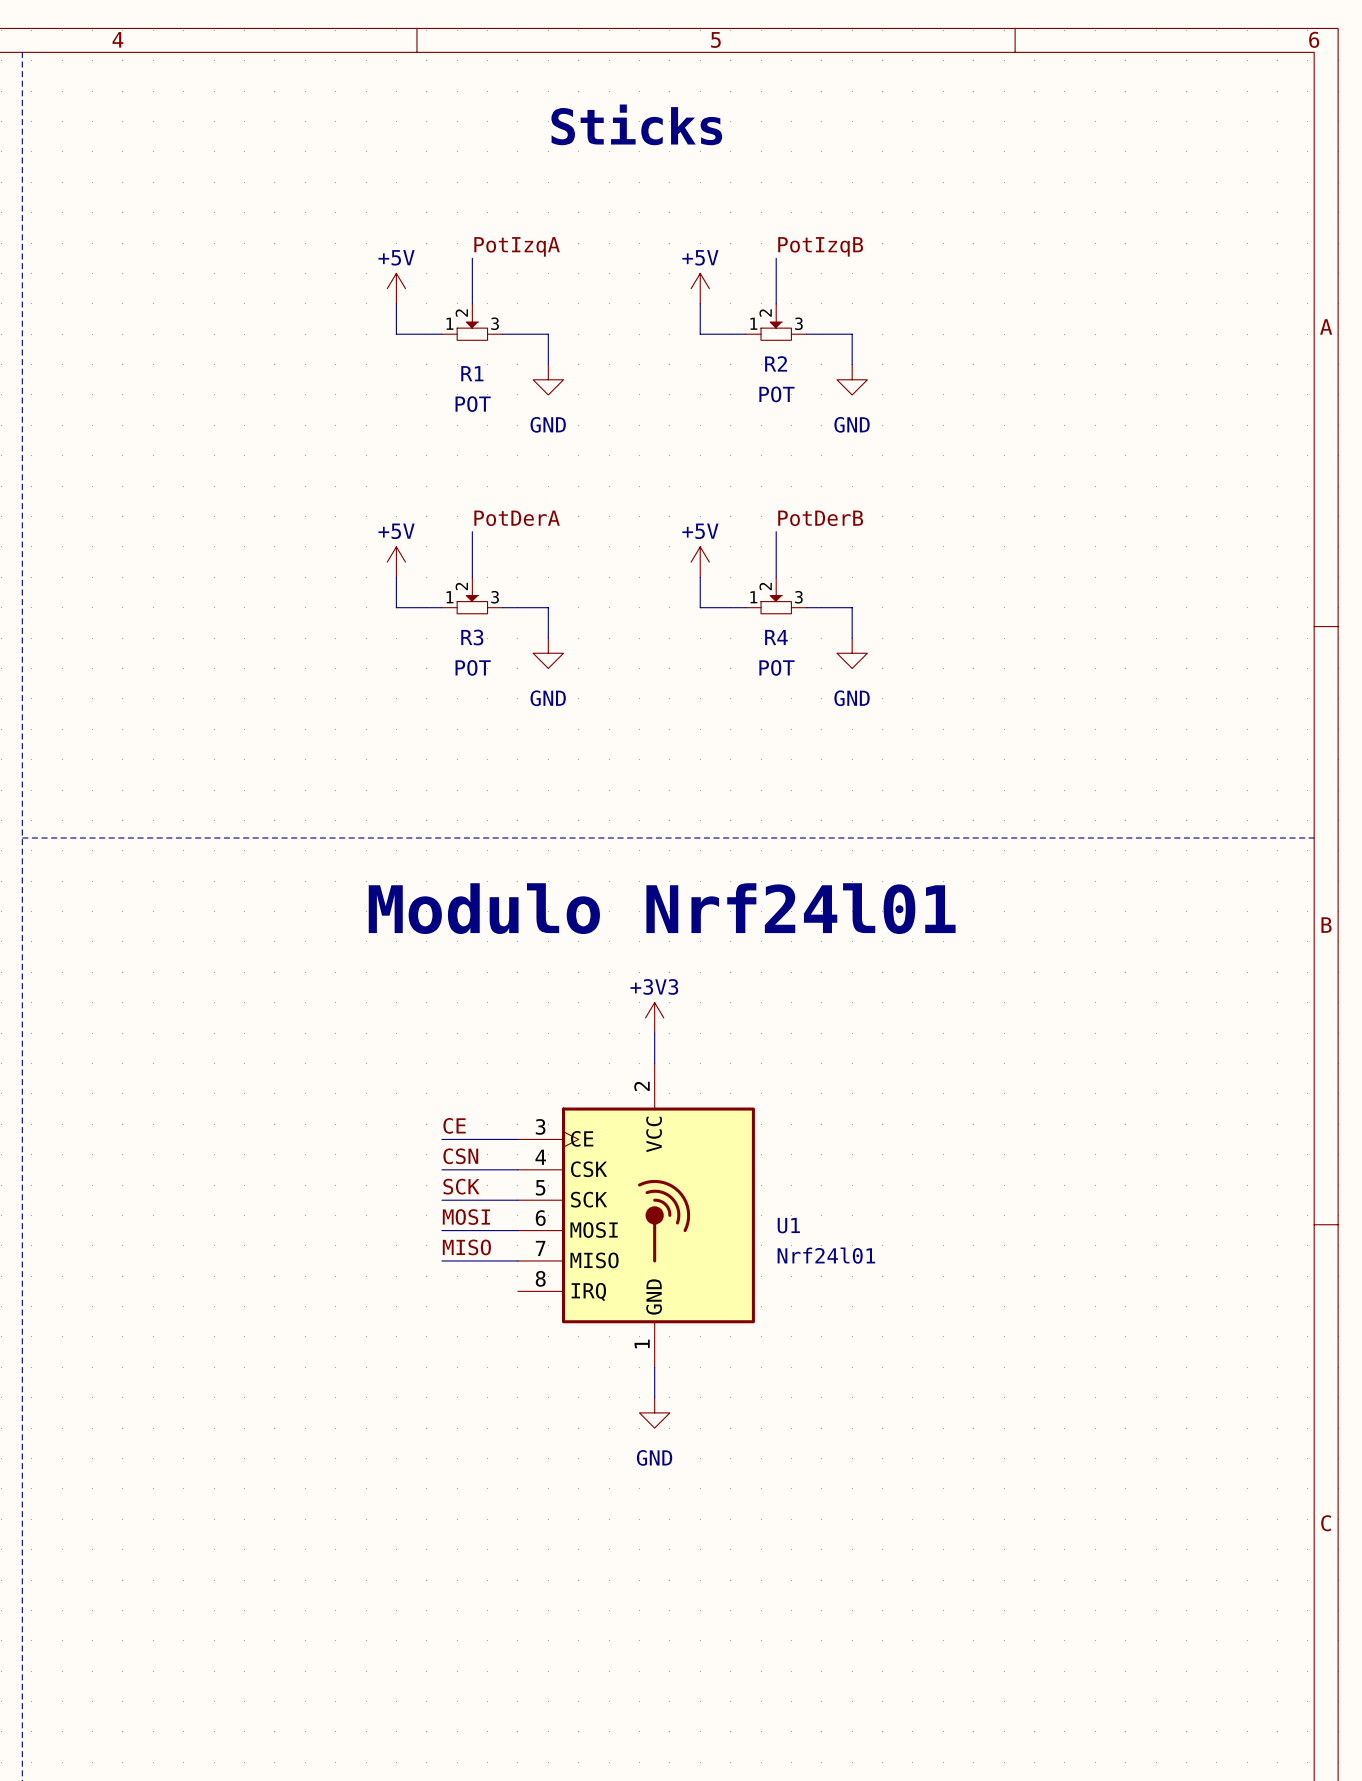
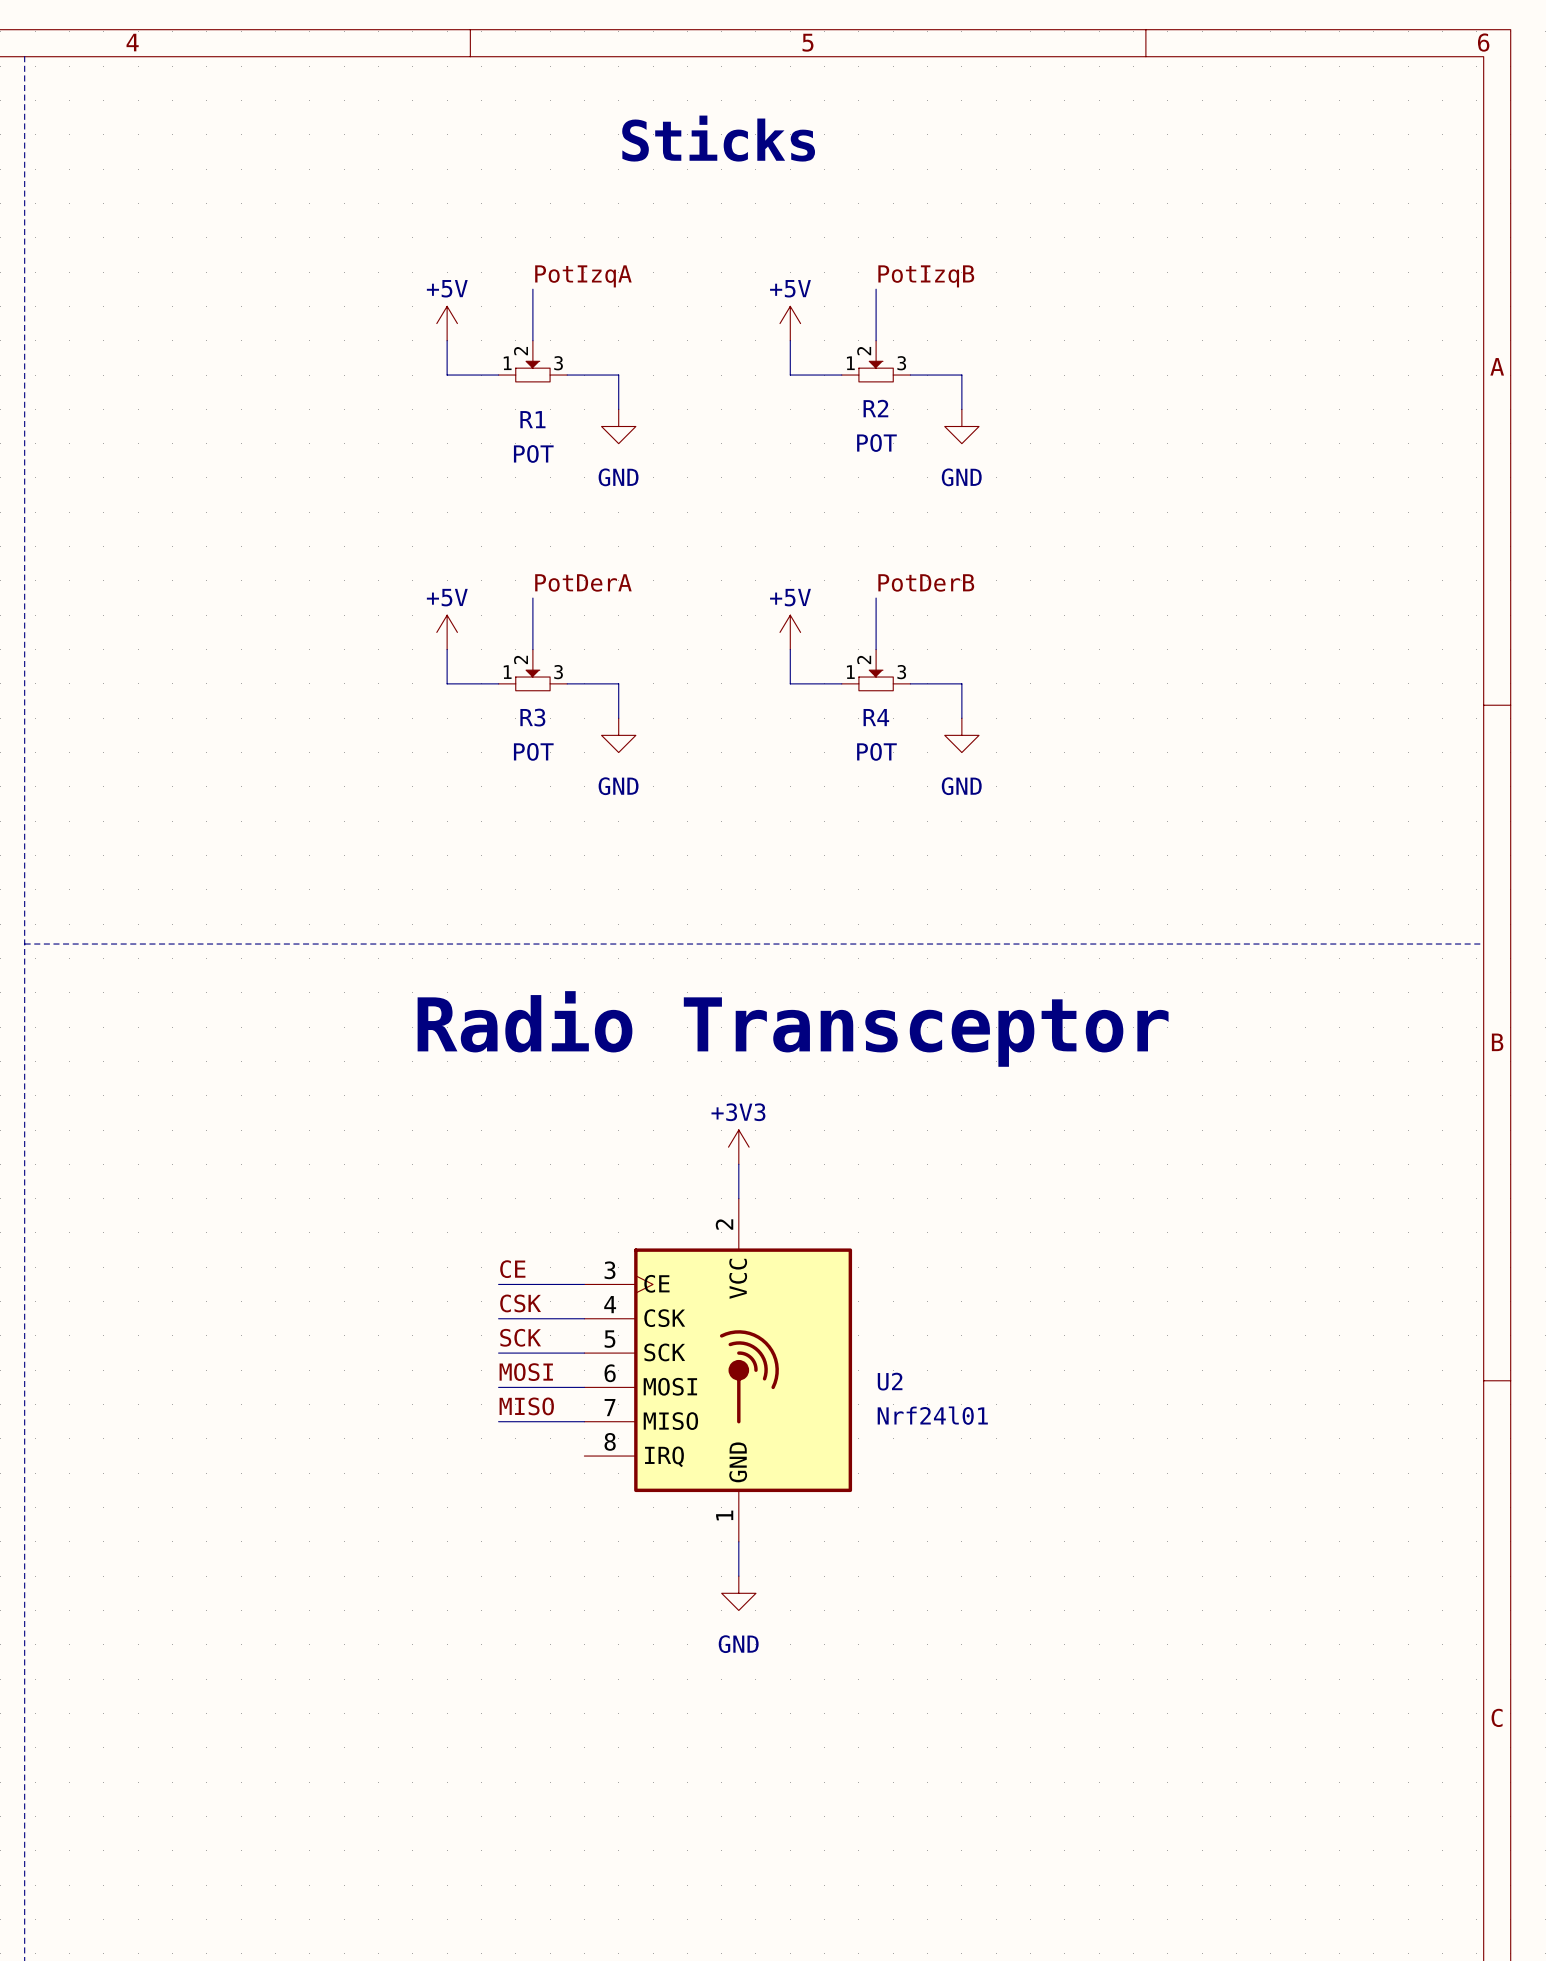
text: Modulo Nrf24l01 (662, 908) -> Radio Transceptor (793, 1028)
label: CSN (460, 1156) -> CSK (520, 1303)
U1 name: U1 (788, 1225) -> U2 (890, 1381)

